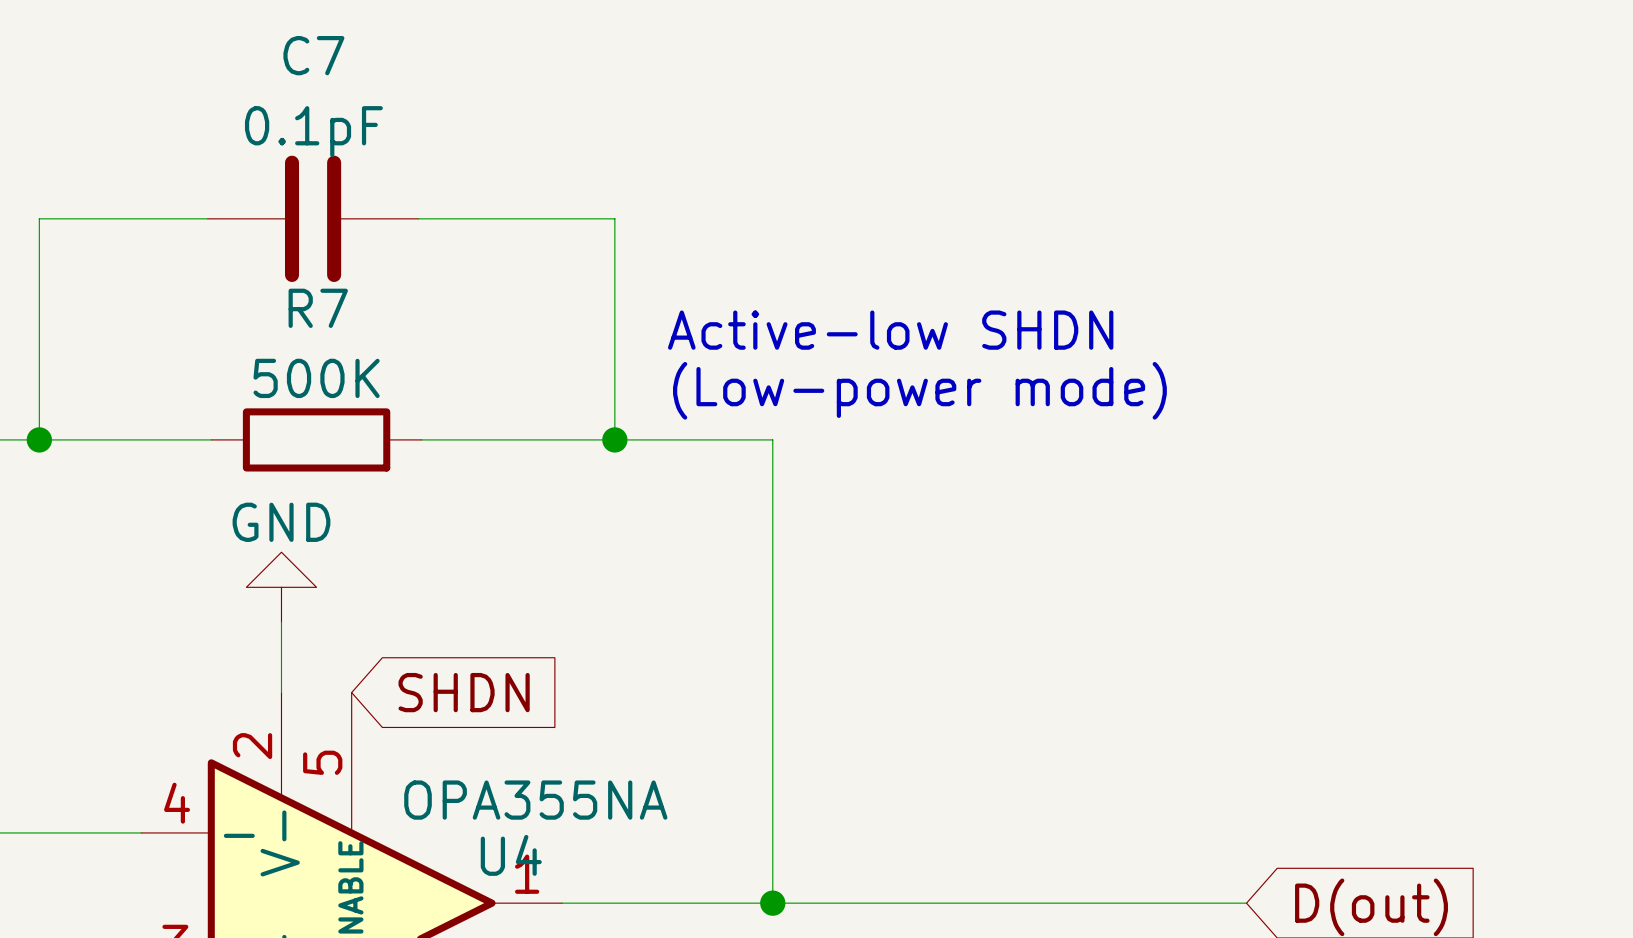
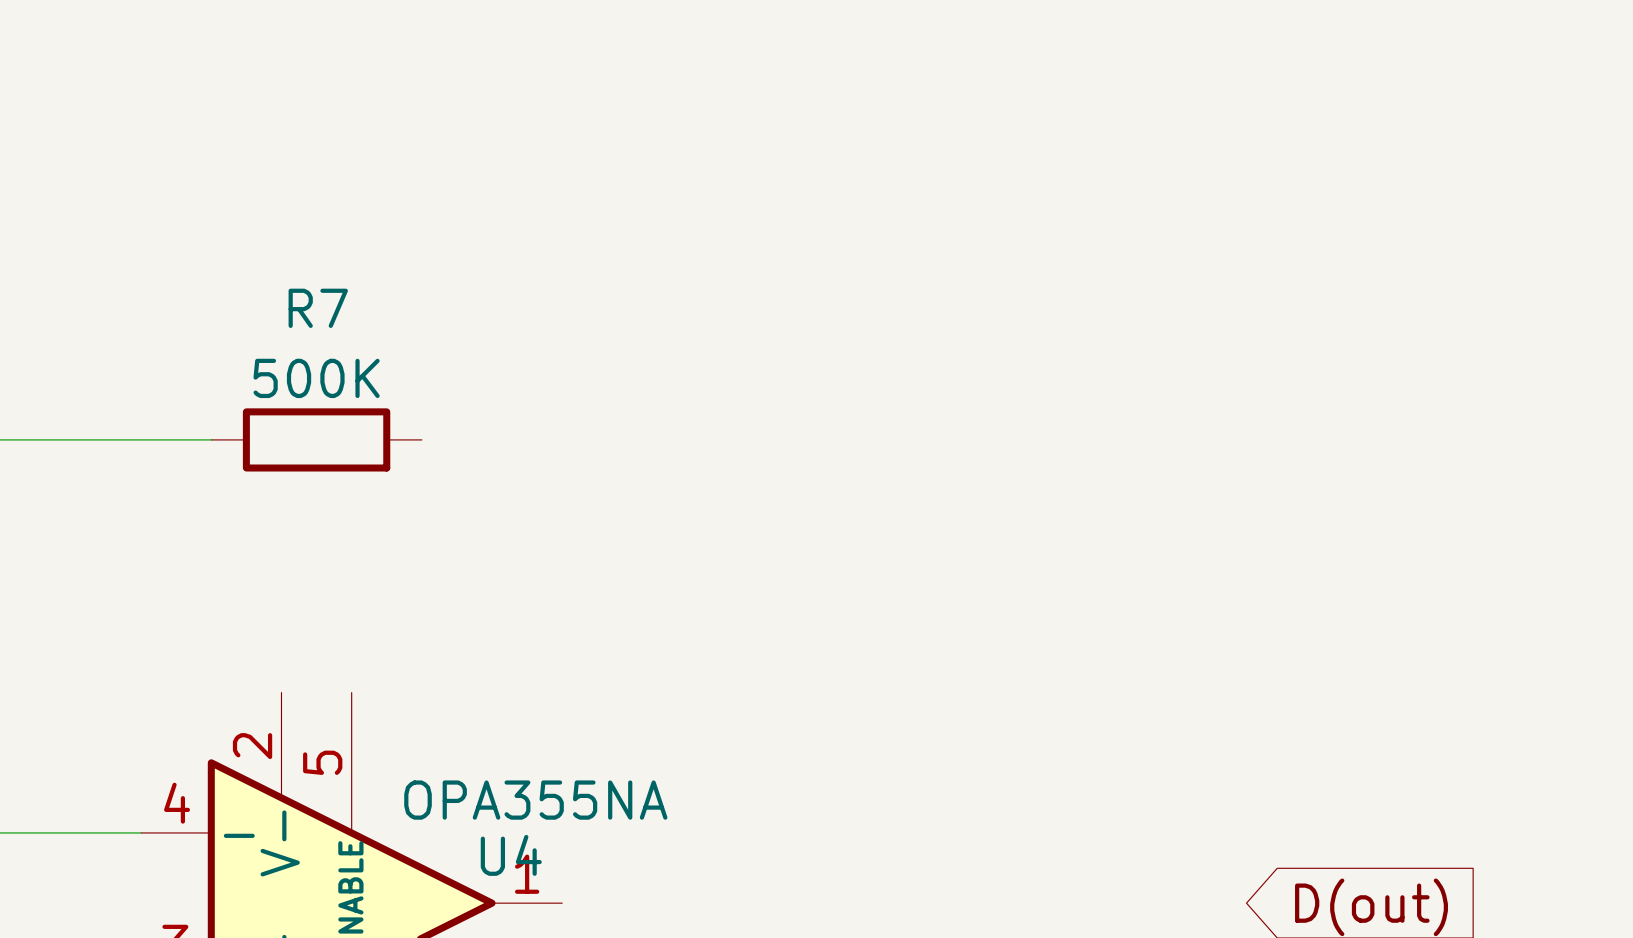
wire: (207, 218) (39, 218) (39, 439) -> none
C7: 0.1pF (313, 218) -> none
wire: (418, 218) (614, 218) (614, 439) -> none
text: Active-low SHDN (890, 330) -> none
text: (Low-power mode) (919, 390) -> none
junction: (39, 439) -> none
wire: (421, 439) (772, 439) (772, 903) -> none
junction: (614, 439) -> none
power symbol: GND (281, 587) -> none
wire: (281, 622) (281, 692) -> none
global label: SHDN (464, 692) -> none
wire: (562, 903) (1246, 903) -> none
junction: (772, 903) -> none

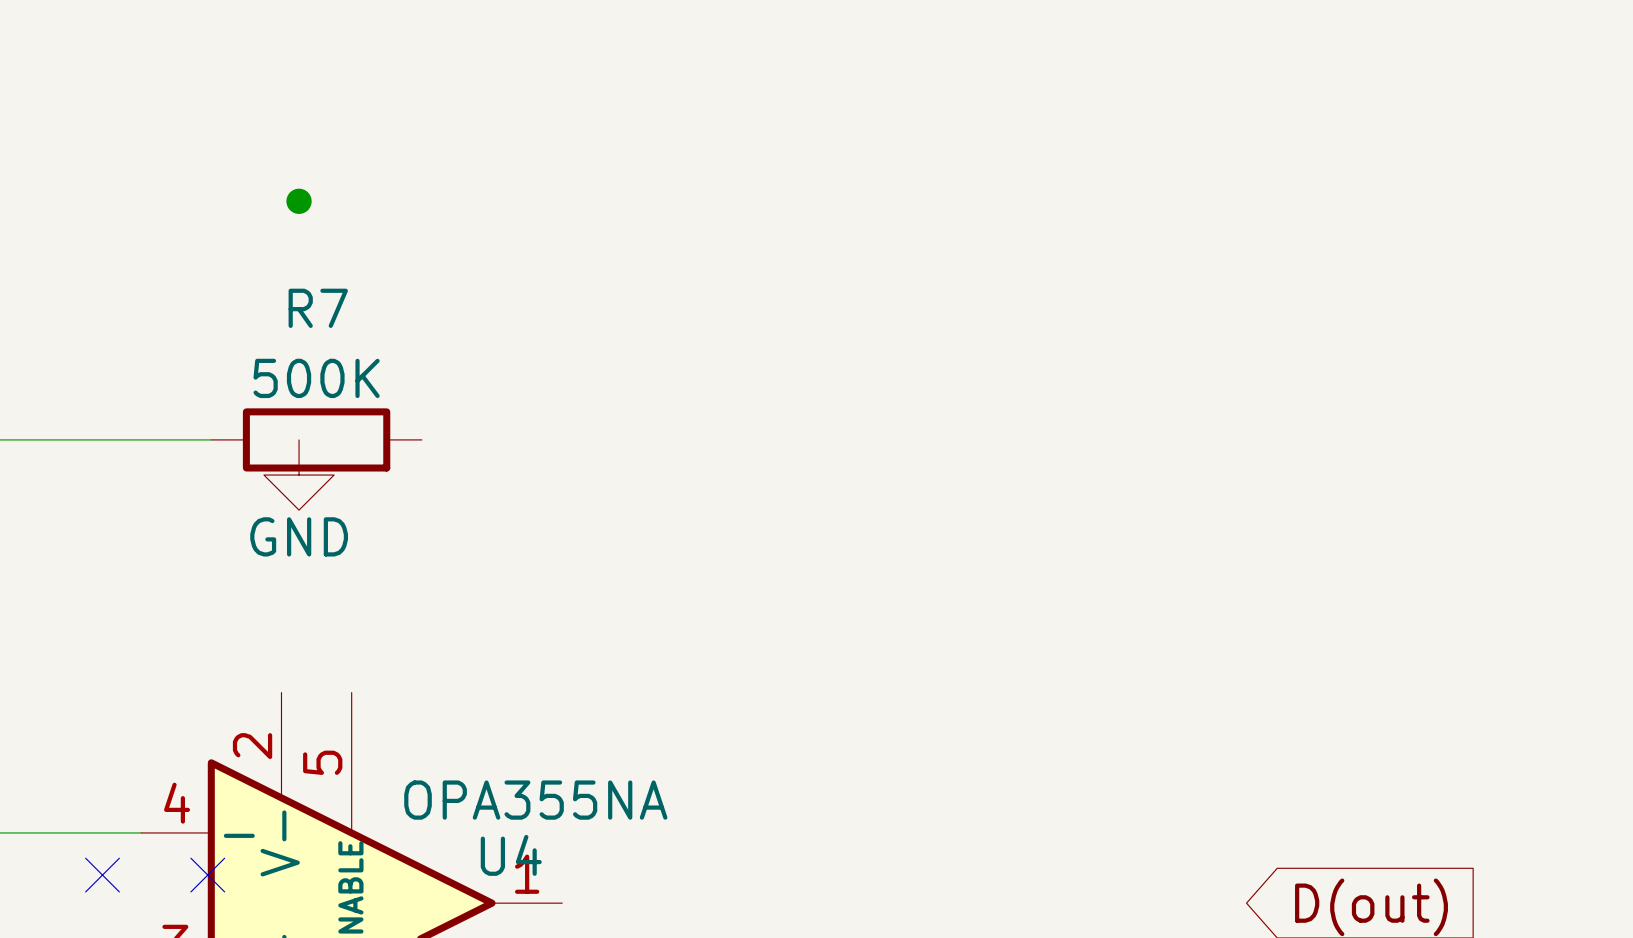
junction: none -> (299, 201)
power symbol: none -> GND (299, 475)
no-connect mark: none -> (102, 875)
no-connect mark: none -> (207, 875)

